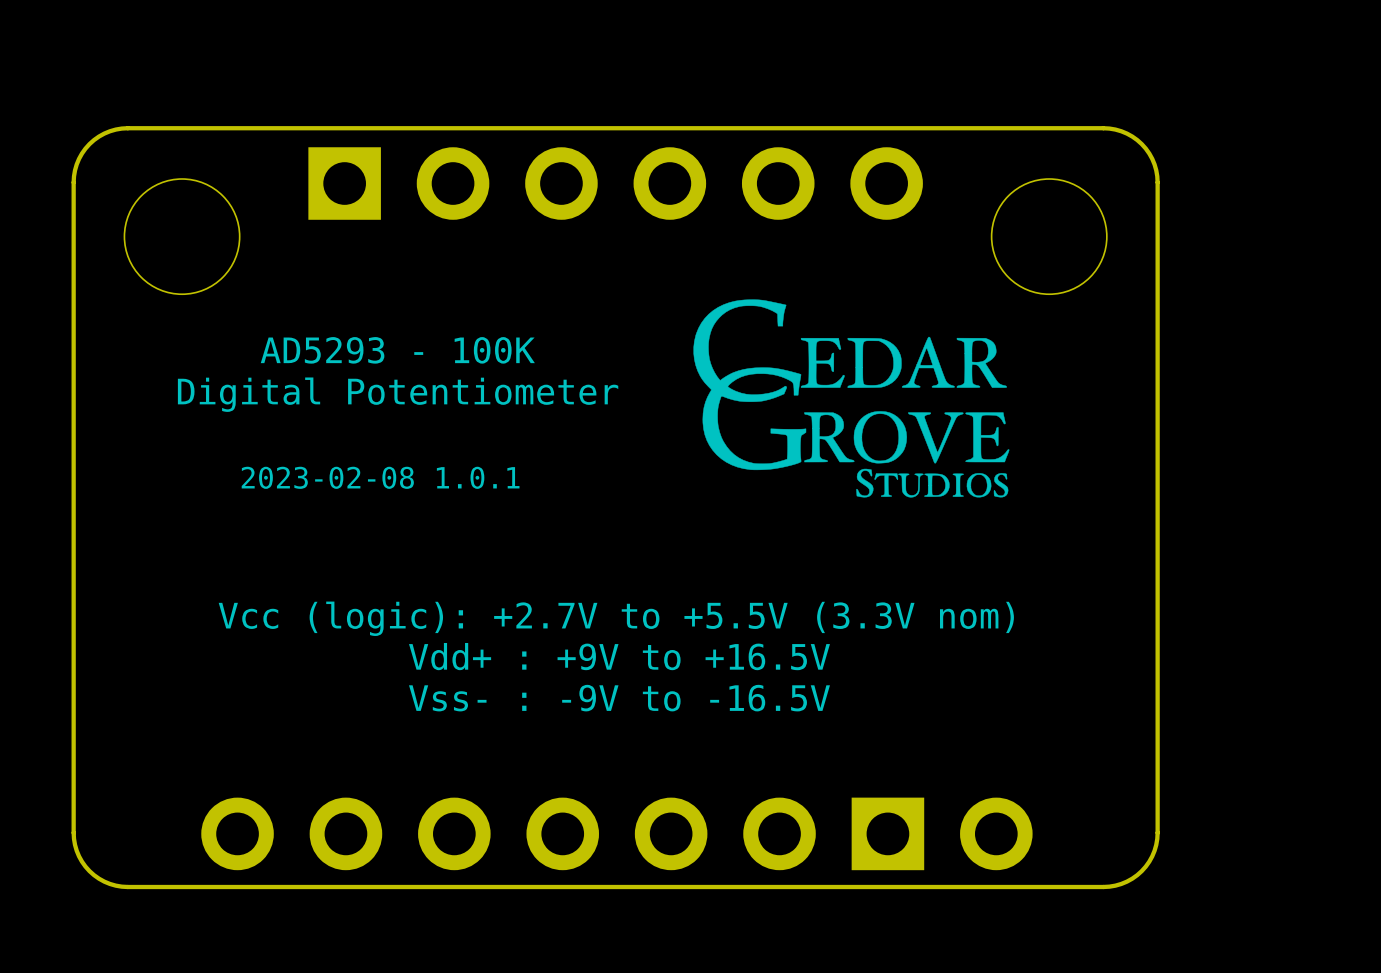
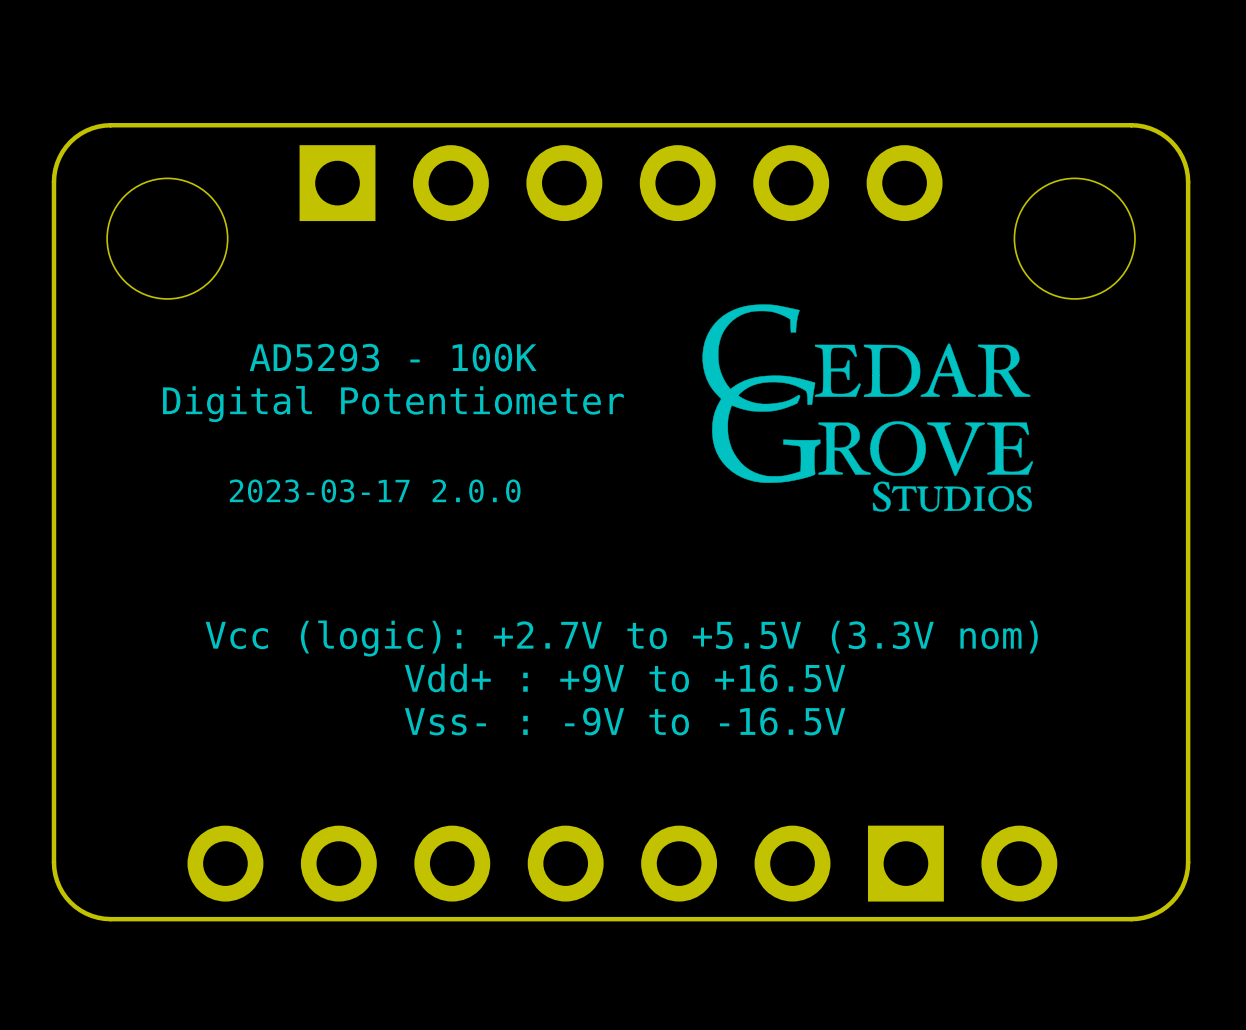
text: 2023-02-08 1.0.1 (380, 477) -> 2023-03-17 2.0.0 (375, 491)

